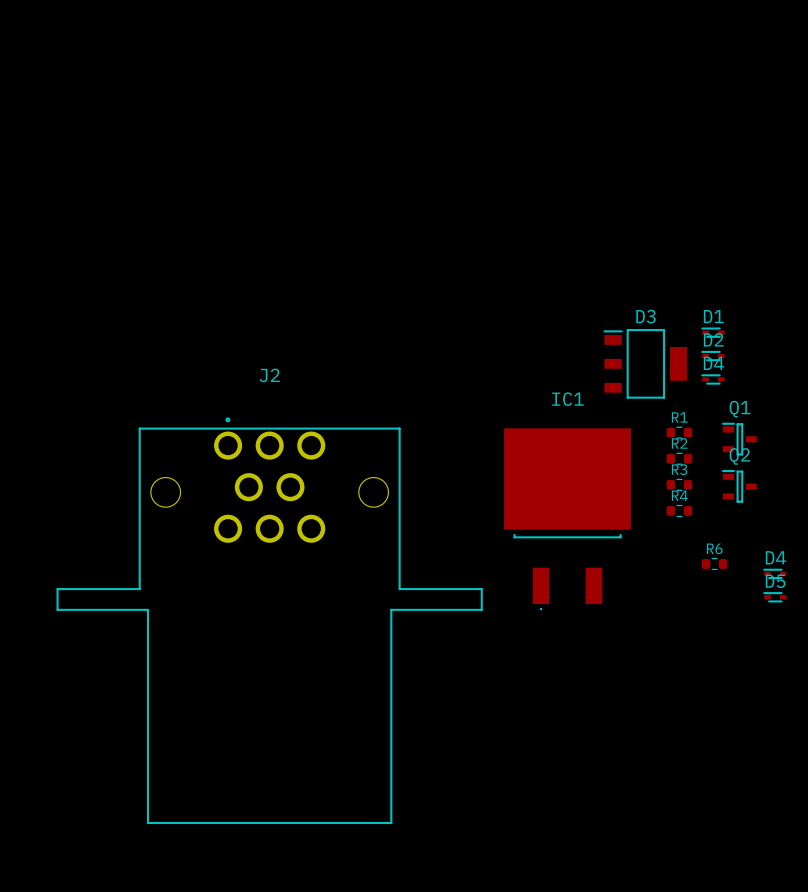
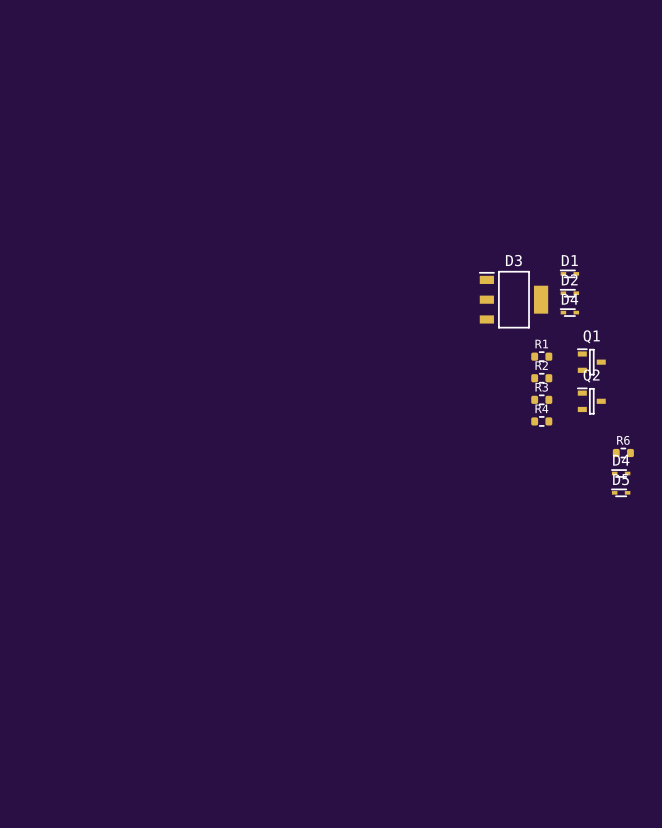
IC1: (567, 519) -> none
R6 position: (714, 564) -> (623, 453)
J2: (269, 620) -> none

